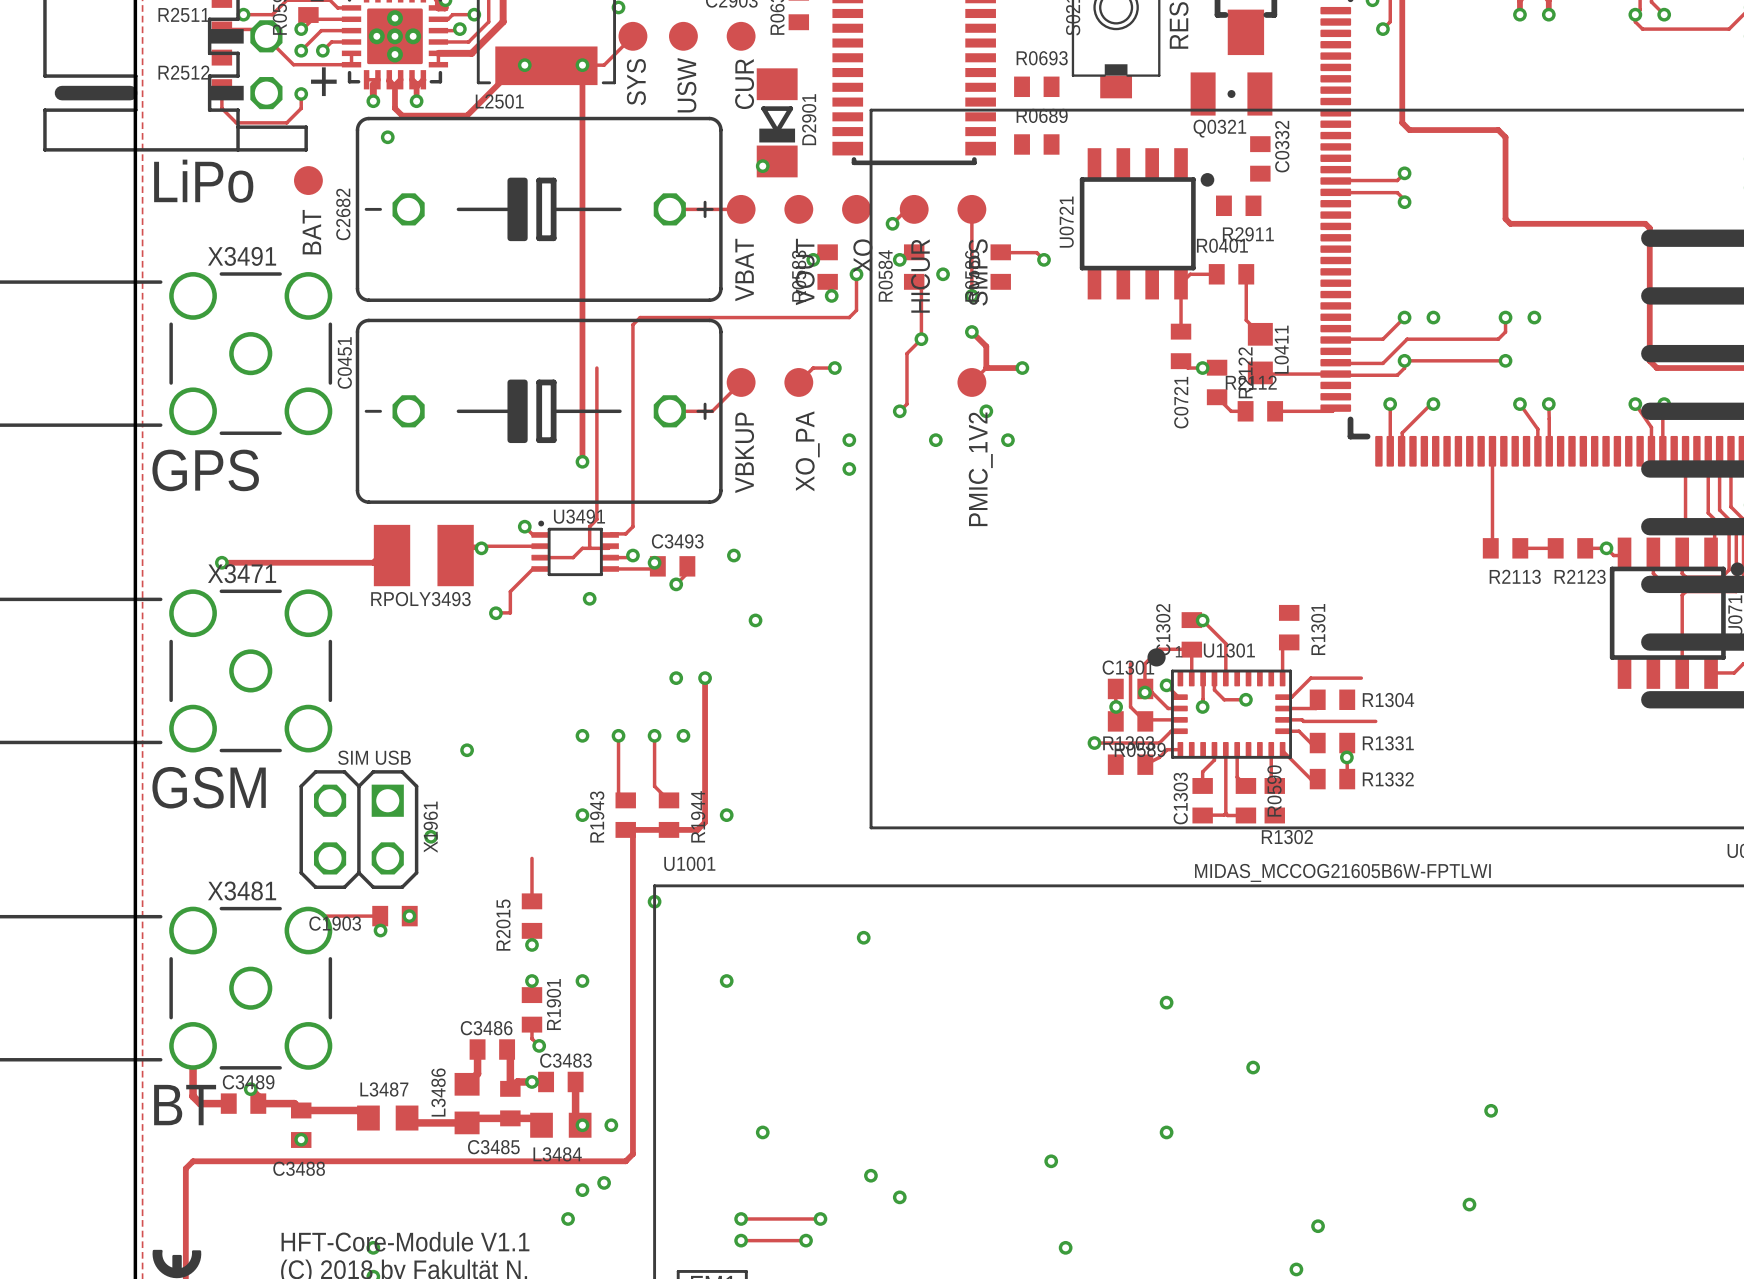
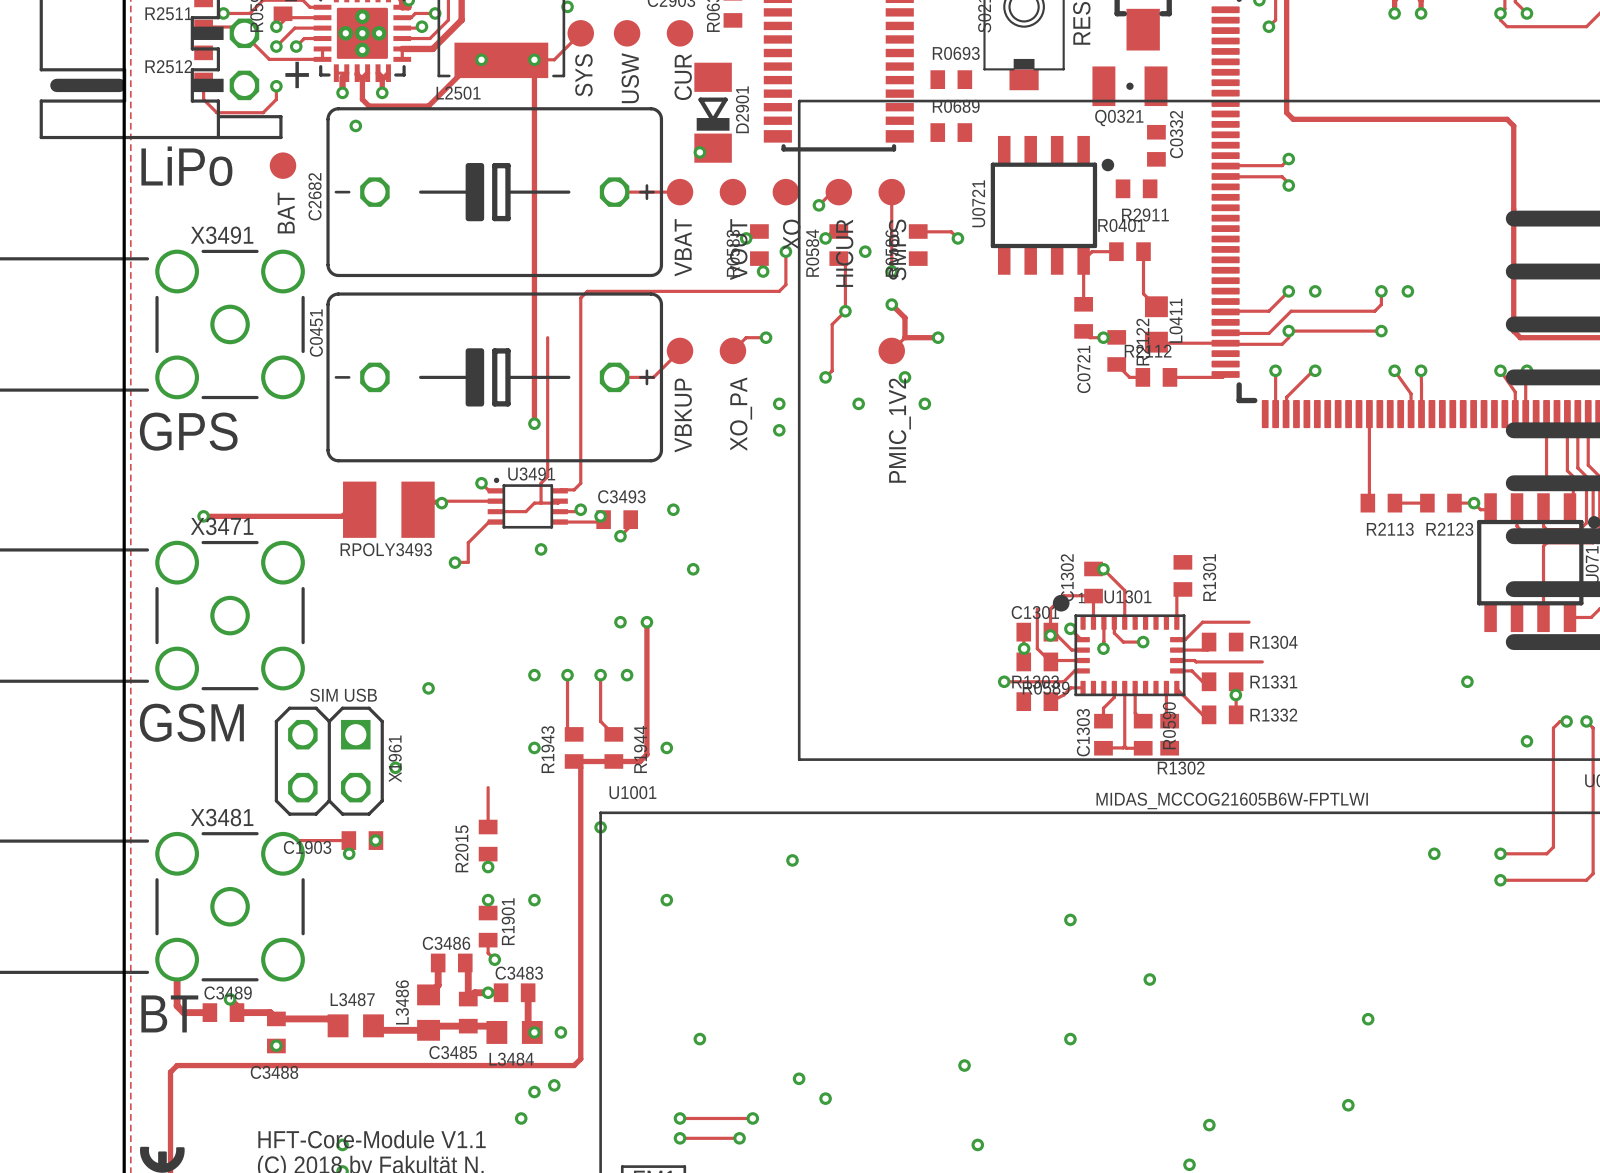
track: (1498, 130) (1505, 137) (1505, 218) (1510, 223) (1645, 223) (1649, 228) -> (1374, 119) (1507, 119) (1513, 125) (1513, 209)
via: none -> (1467, 681)
track: none -> (1566, 721) (1560, 721) (1553, 728) (1553, 847) (1546, 853) (1500, 853)
via: none -> (1566, 721)
track: none -> (1586, 721) (1593, 728) (1593, 873) (1586, 880) (1500, 880)
via: none -> (1586, 721)
via: none -> (1526, 741)
via: none -> (1434, 853)
via: none -> (1500, 853)
via: none -> (1500, 880)

